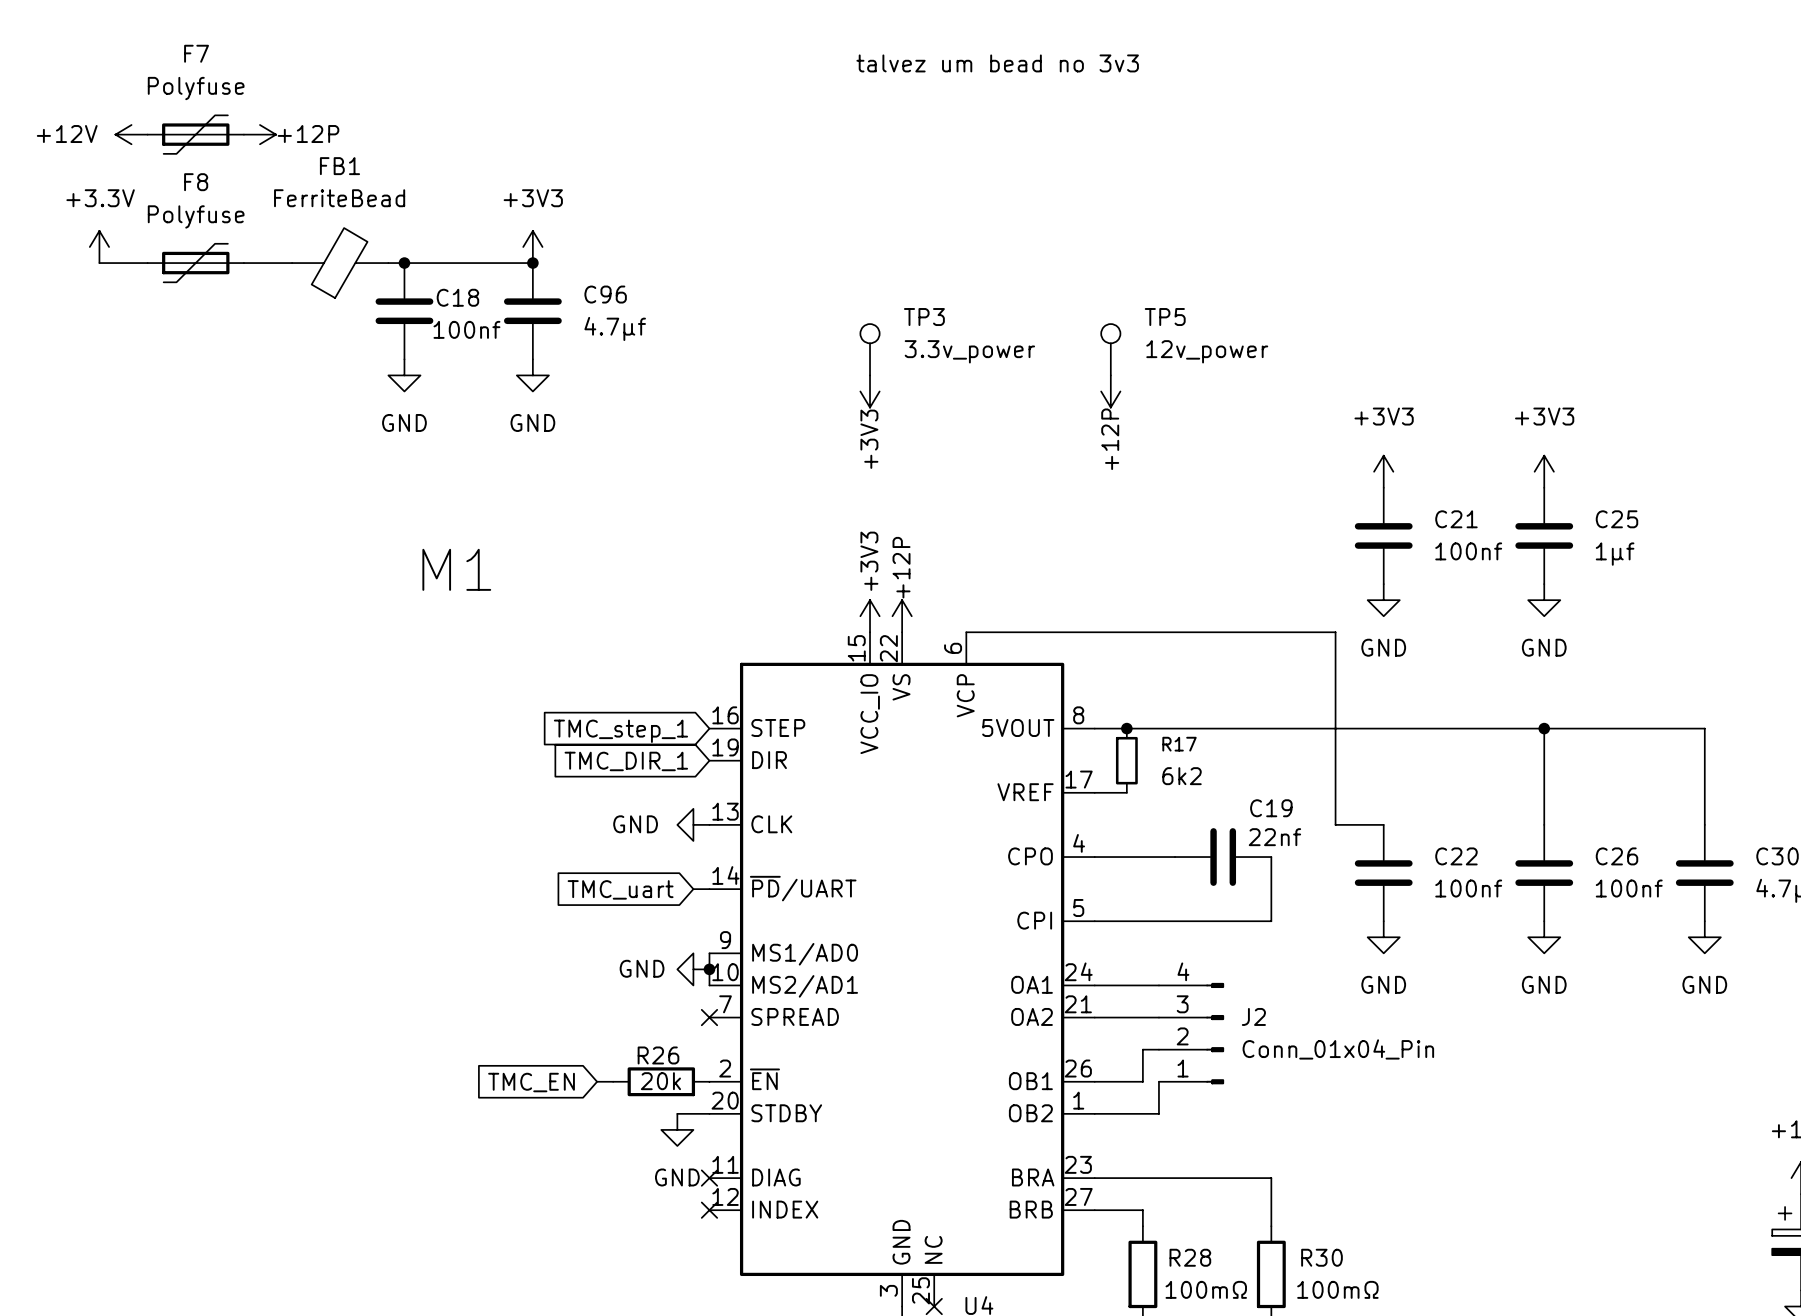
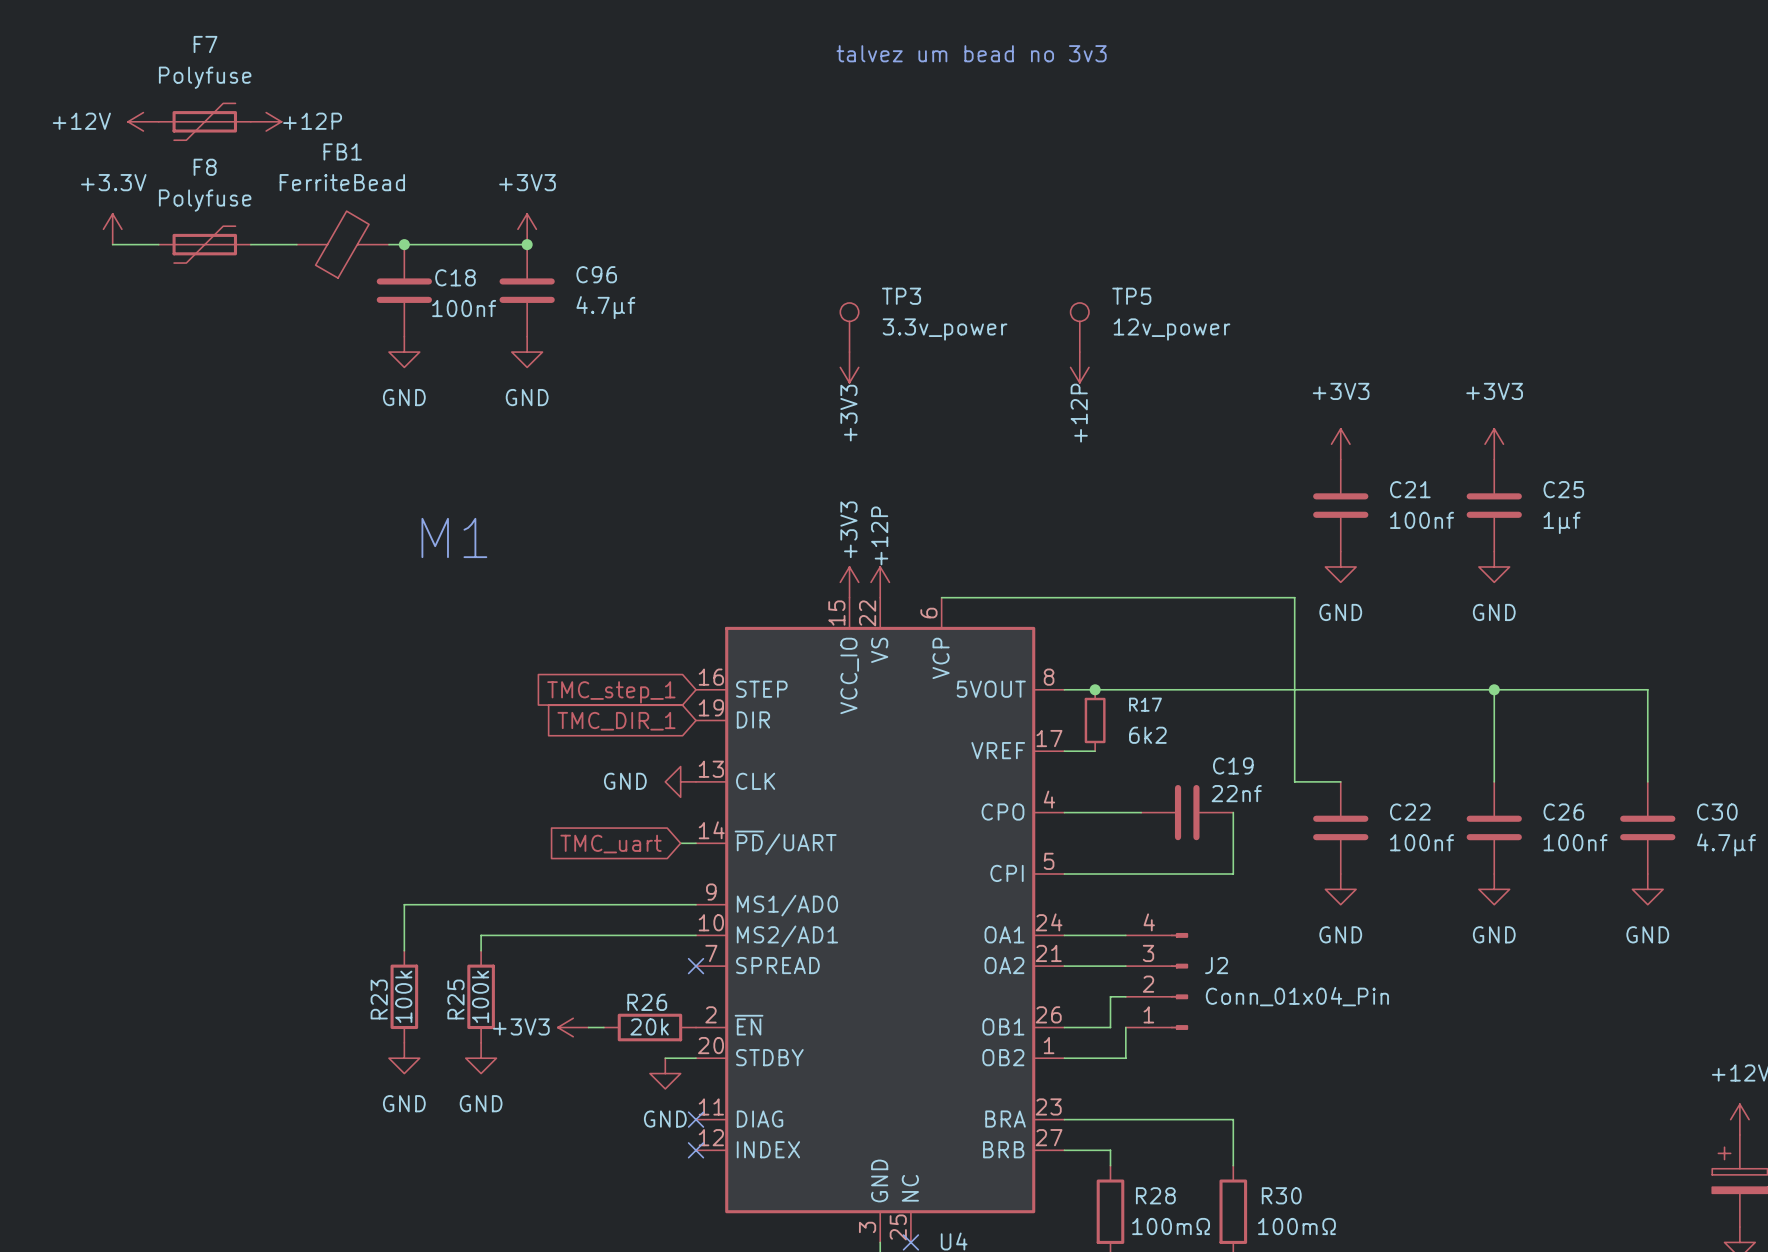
wire: (709, 953) (709, 985) -> (481, 950) (481, 935) (696, 935)
wire: none -> (696, 904) (404, 904) (404, 950)
power symbol: GND (693, 969) -> none
junction: (709, 969) -> none
R23: none -> 100k (404, 996)
R25: none -> 100k (481, 996)
power symbol: none -> +3V3 (573, 1027)
global label: TMC_EN (531, 1082) -> none
power symbol: none -> GND (404, 1058)
power symbol: none -> GND (481, 1058)

